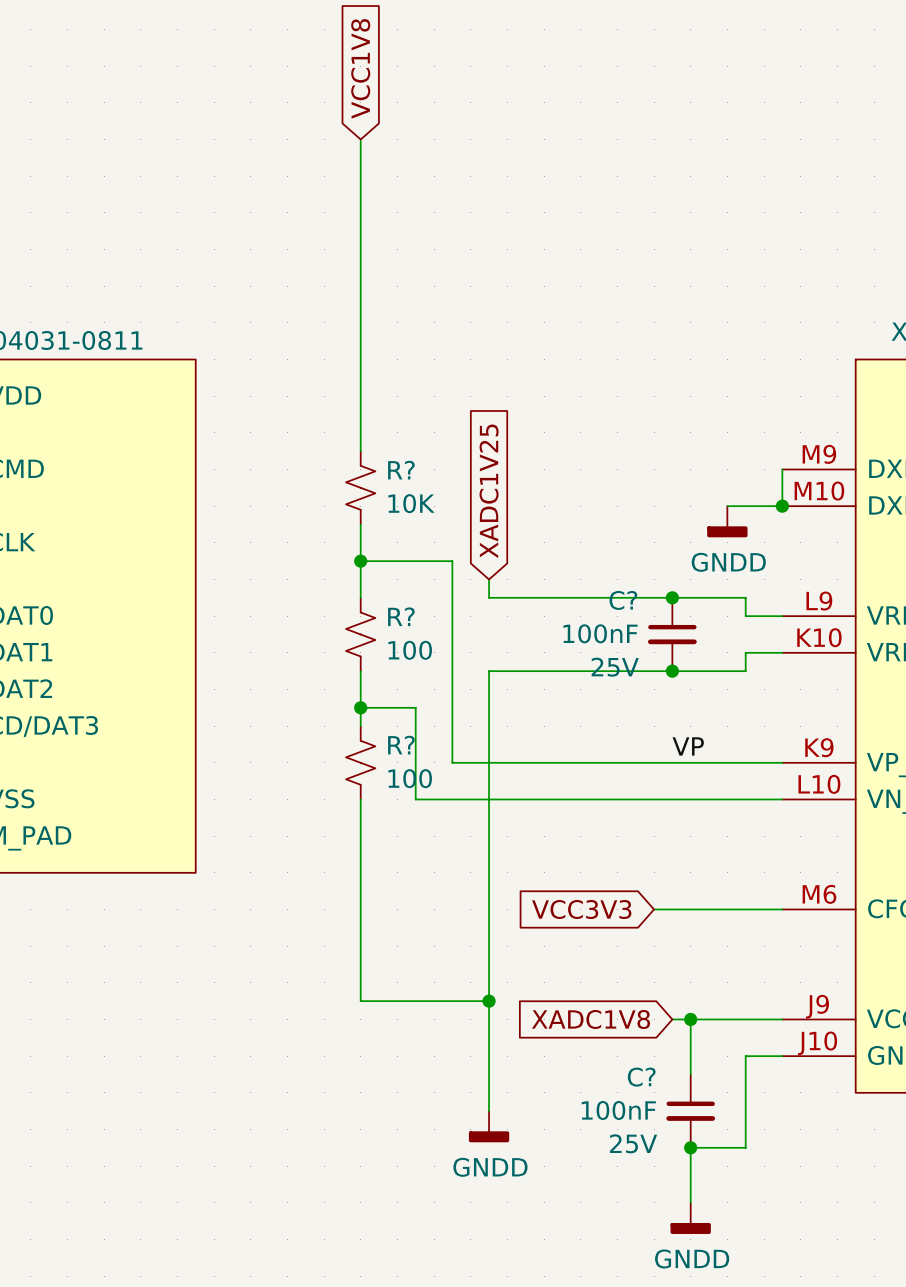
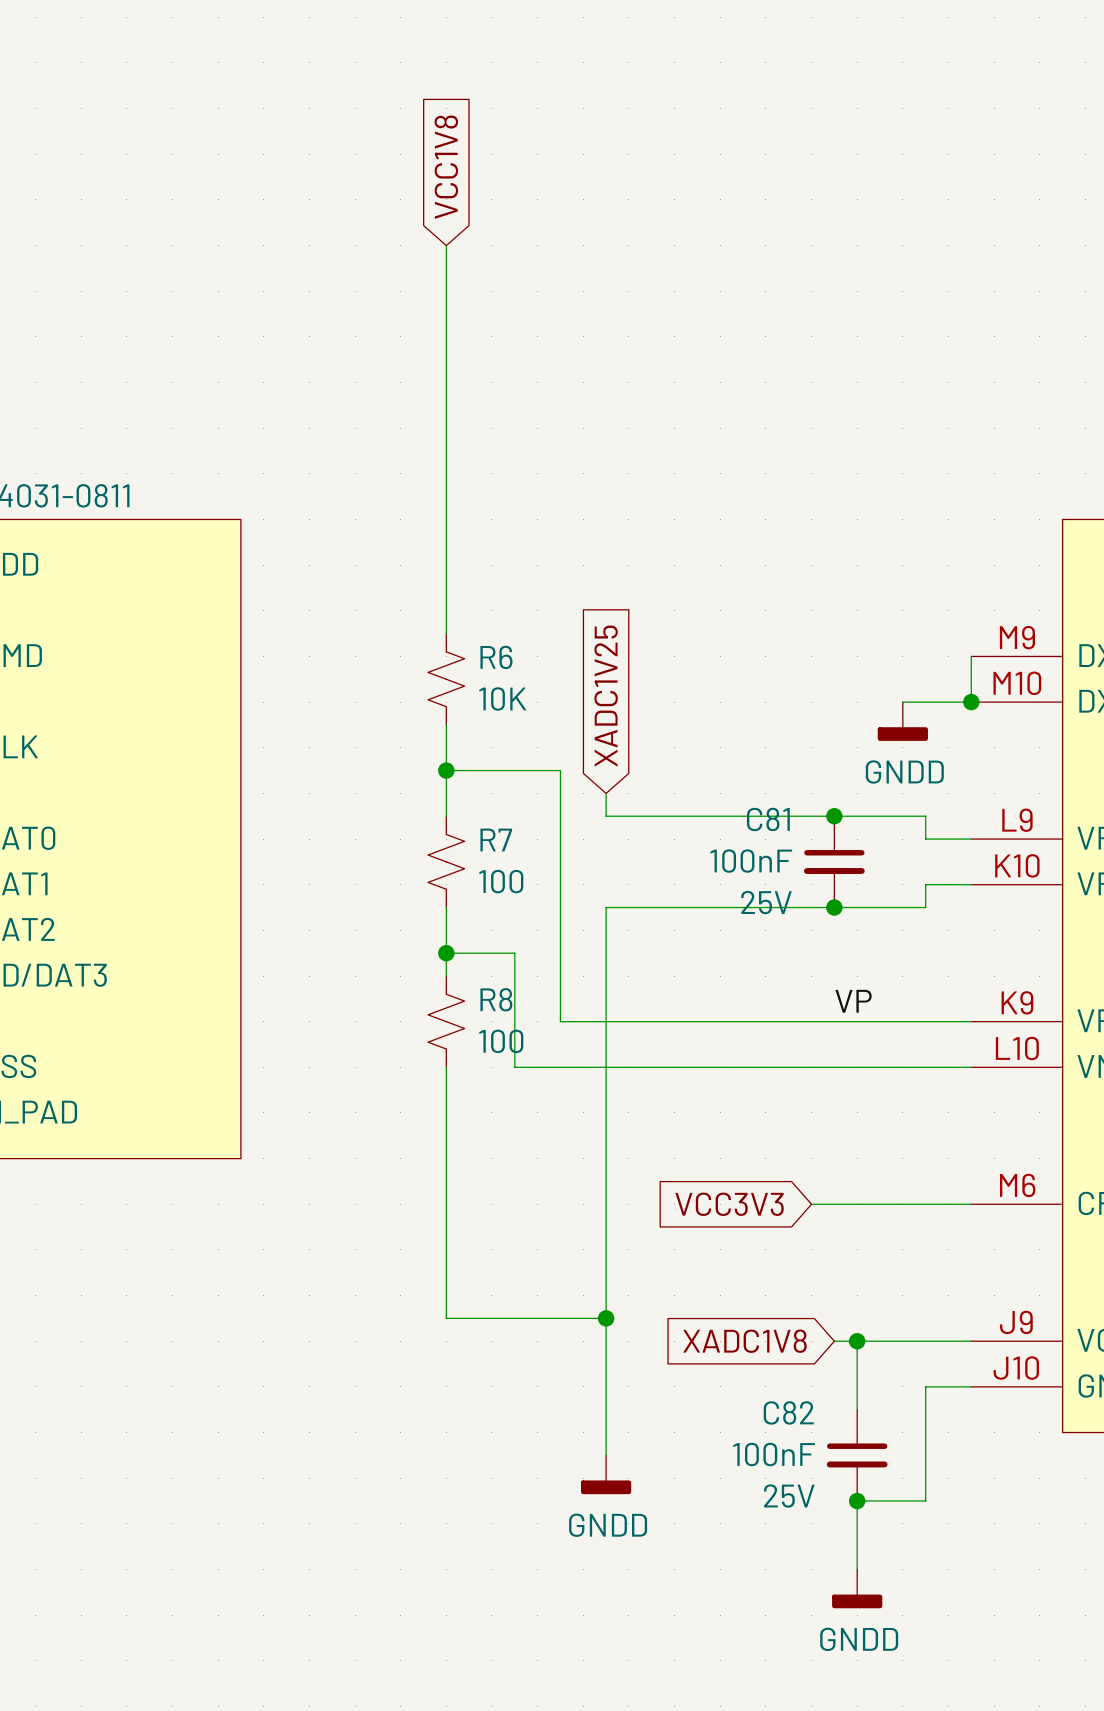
R? name: R? (401, 470) -> R6 (496, 657)
C? name: C? (623, 600) -> C81 (768, 819)
R? name: R? (401, 616) -> R7 (496, 840)
R? name: R? (401, 745) -> R8 (496, 999)
C? name: C? (641, 1077) -> C82 (788, 1412)

